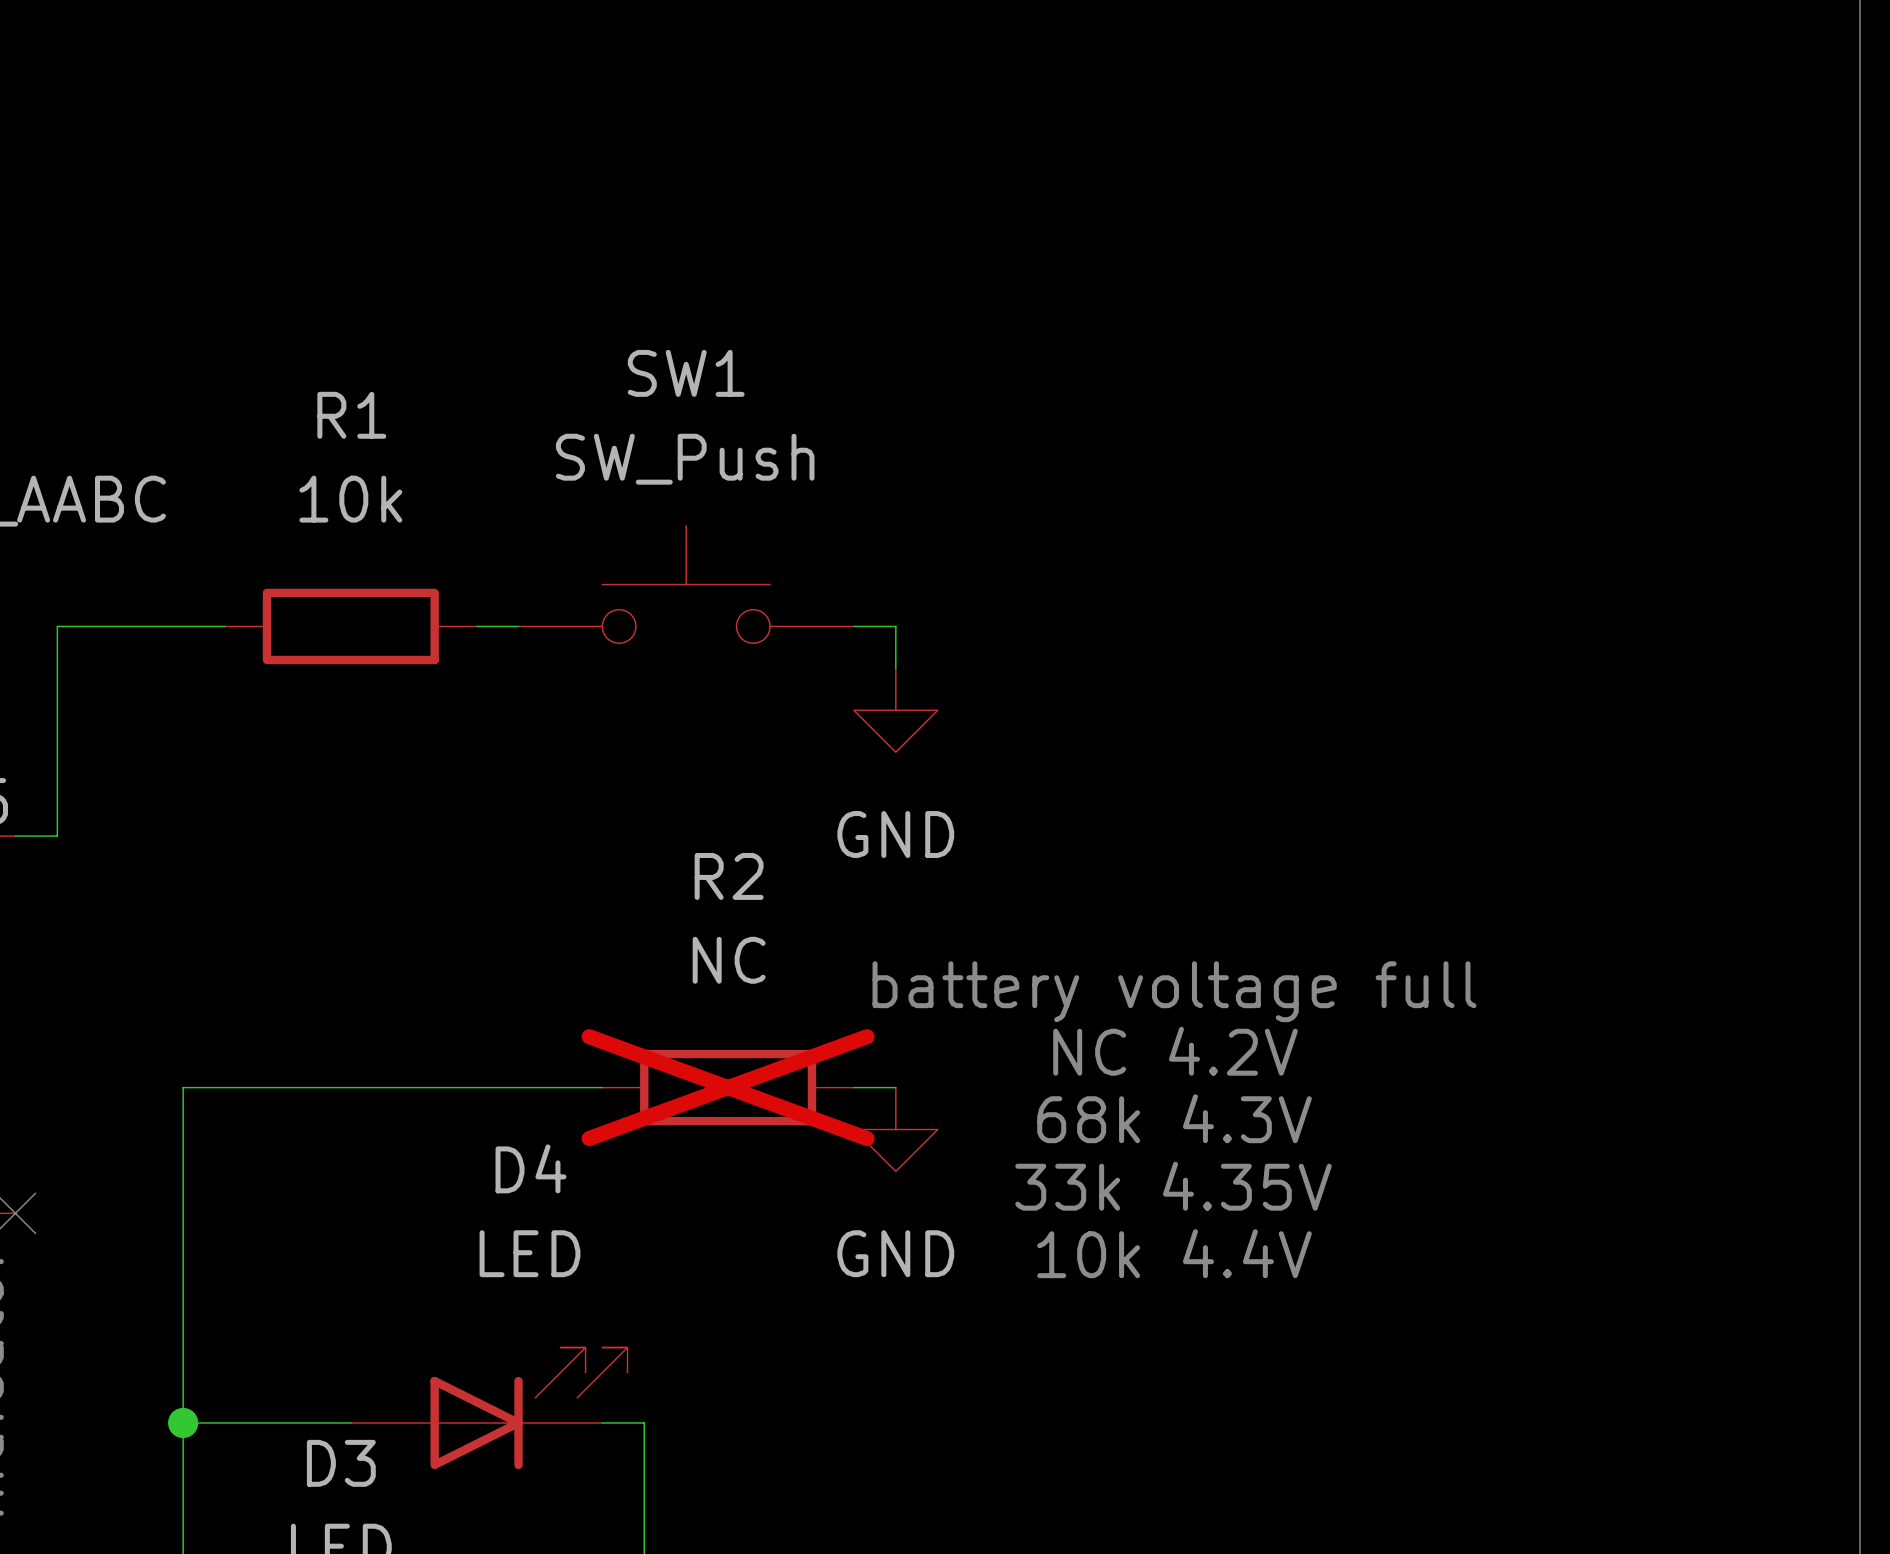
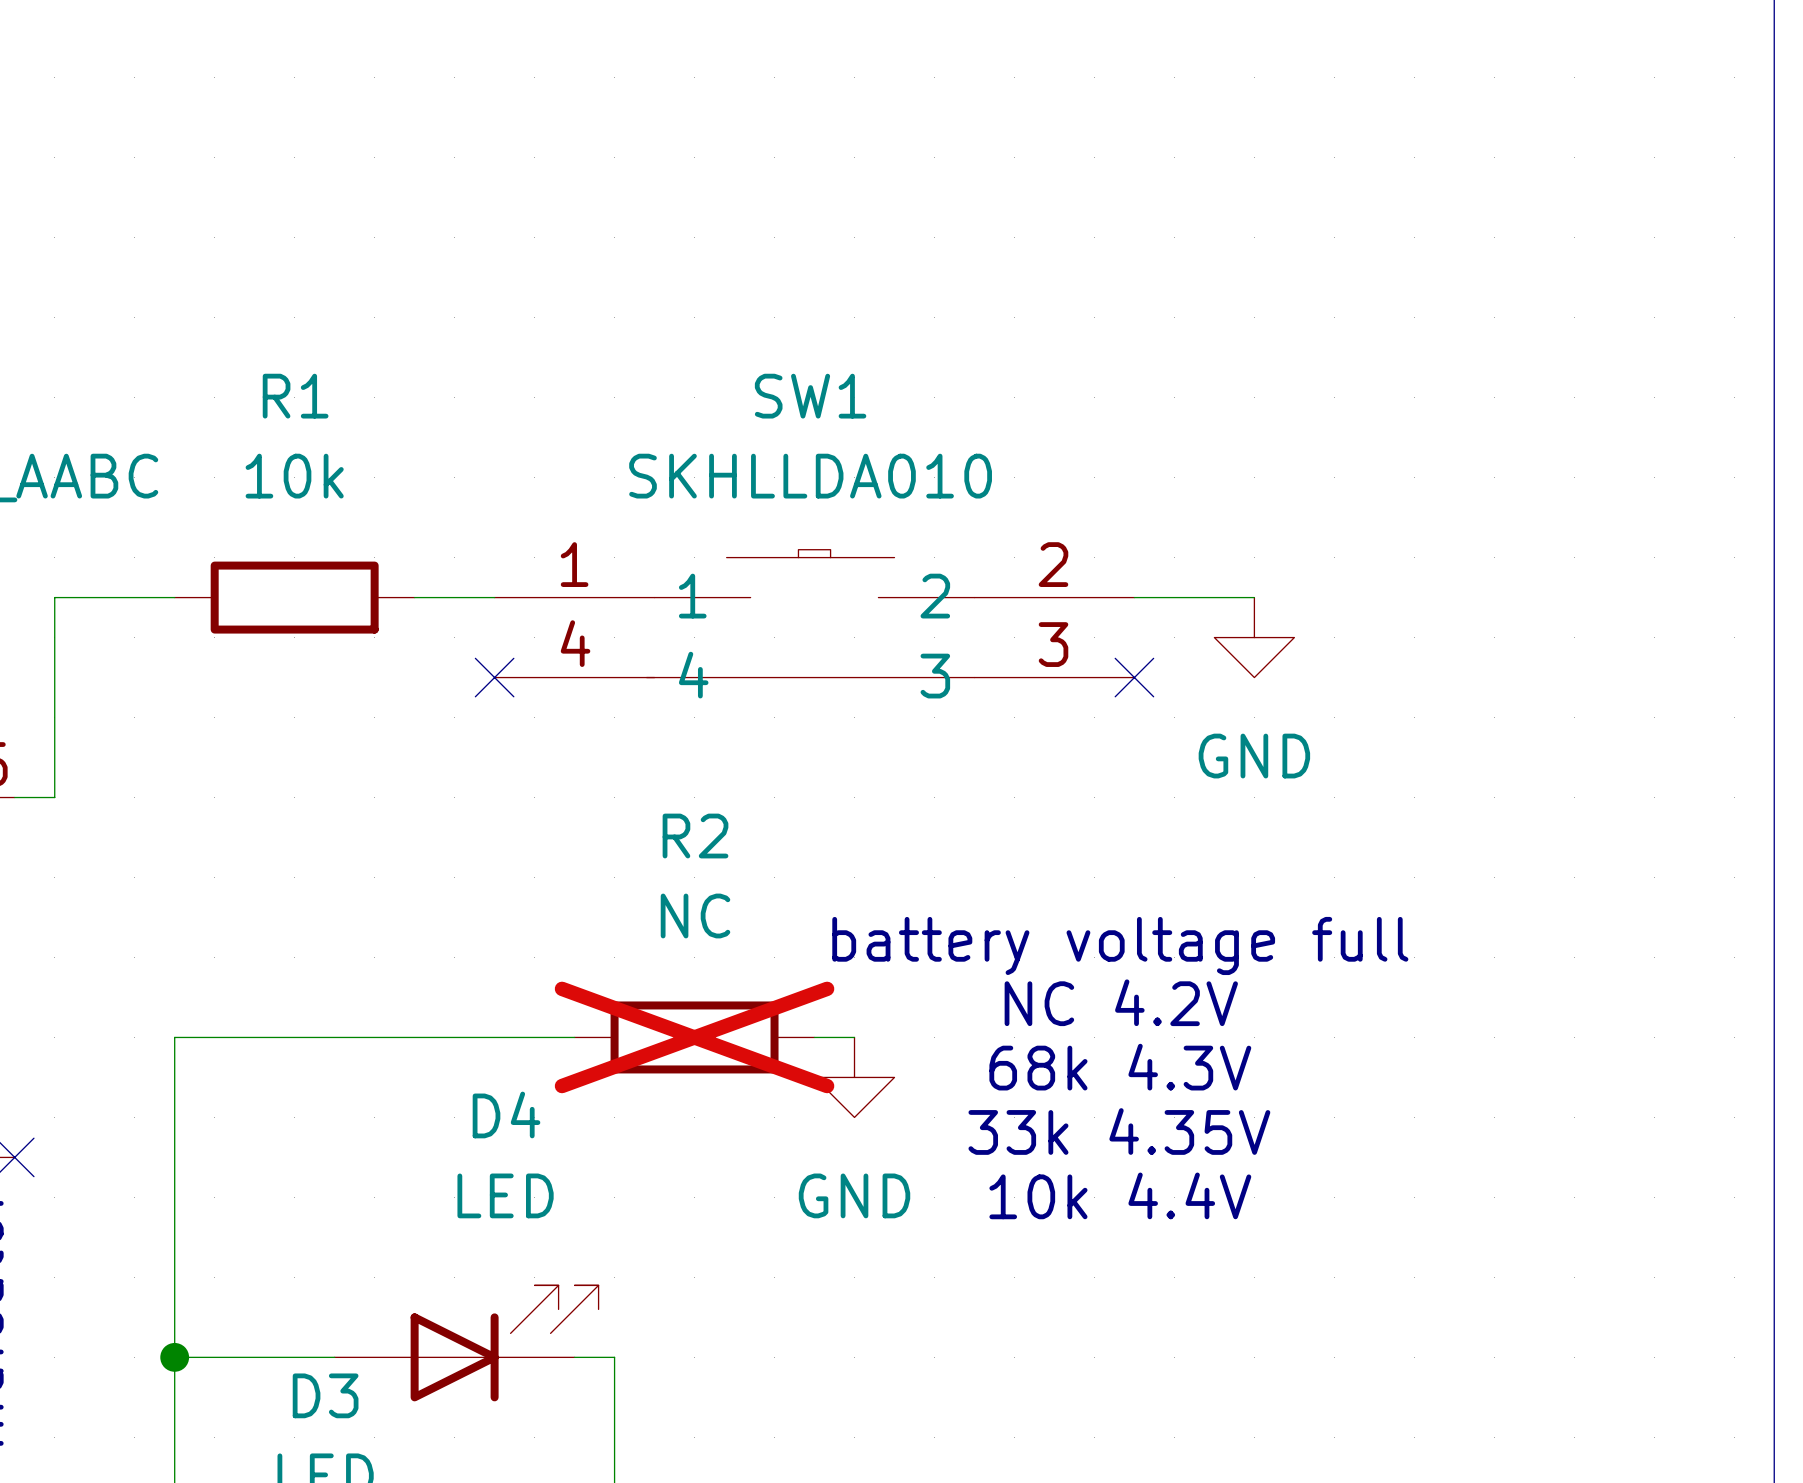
SW1 value: SW_Push (685, 459) -> SKHLLDA010 (810, 476)
SW1 symbol: [518, 525, 854, 644] -> [494, 549, 1135, 678]
R1 position: (350, 626) -> (294, 597)
wire: (853, 626) (895, 626) (895, 668) -> none
wire: none -> (1134, 597) (1254, 597)
no-connect mark: none -> (494, 677)
power symbol position: GND (895, 710) -> GND (1254, 637)
no-connect mark: none -> (1134, 677)

